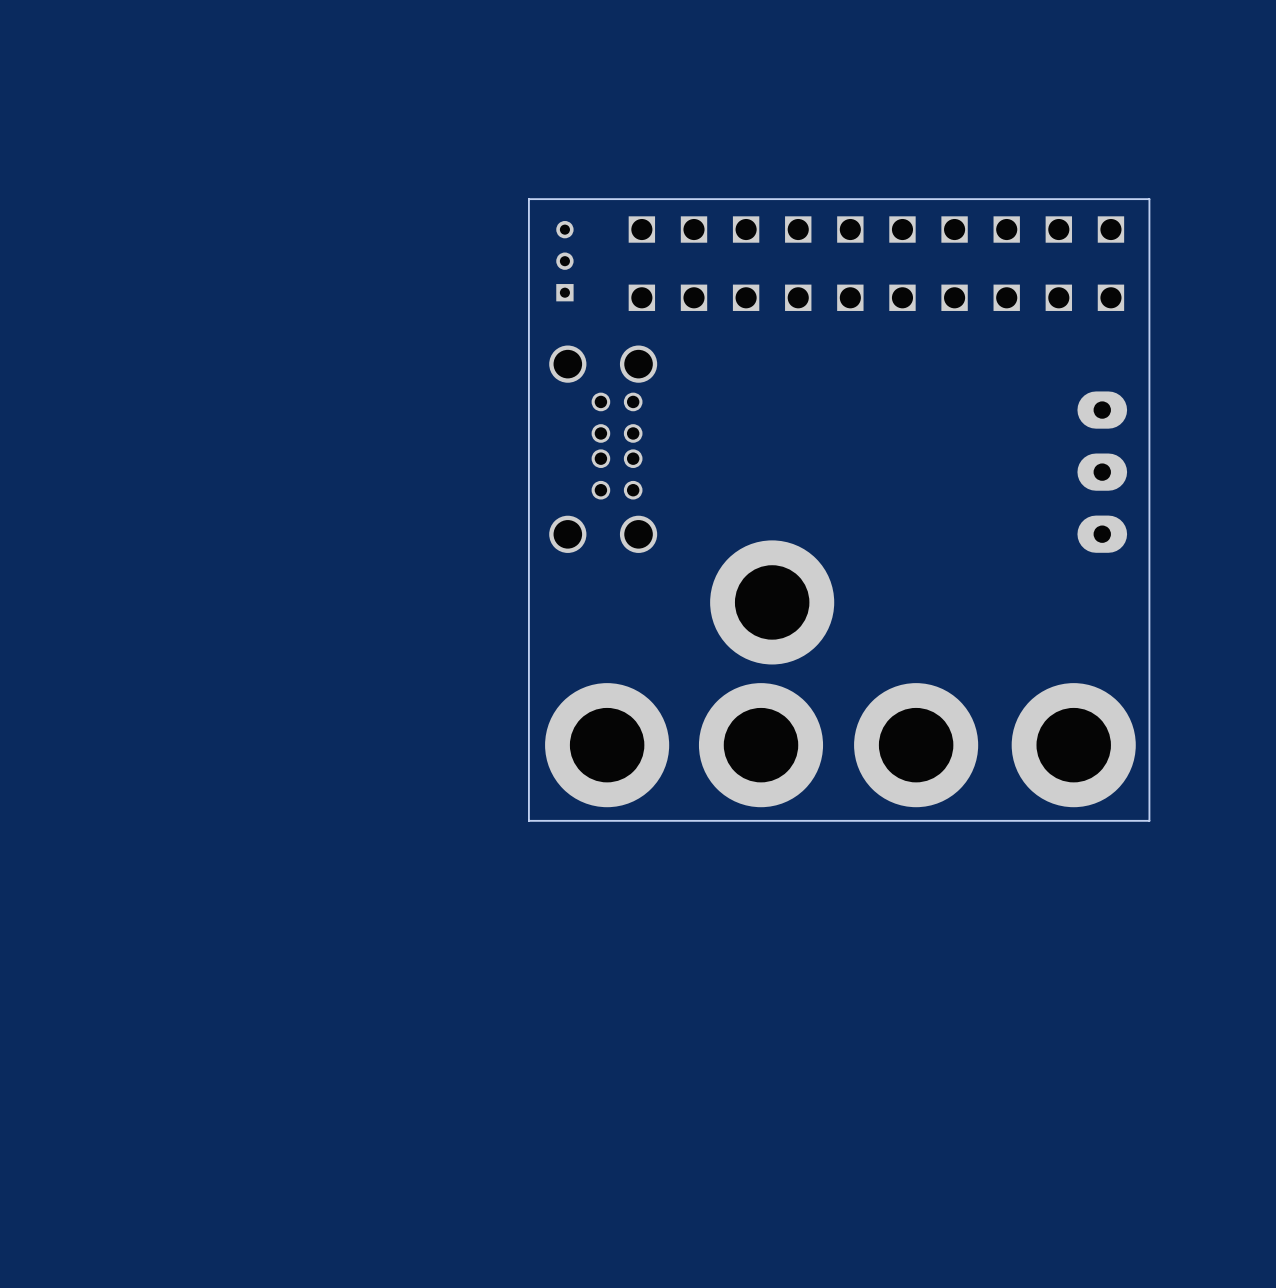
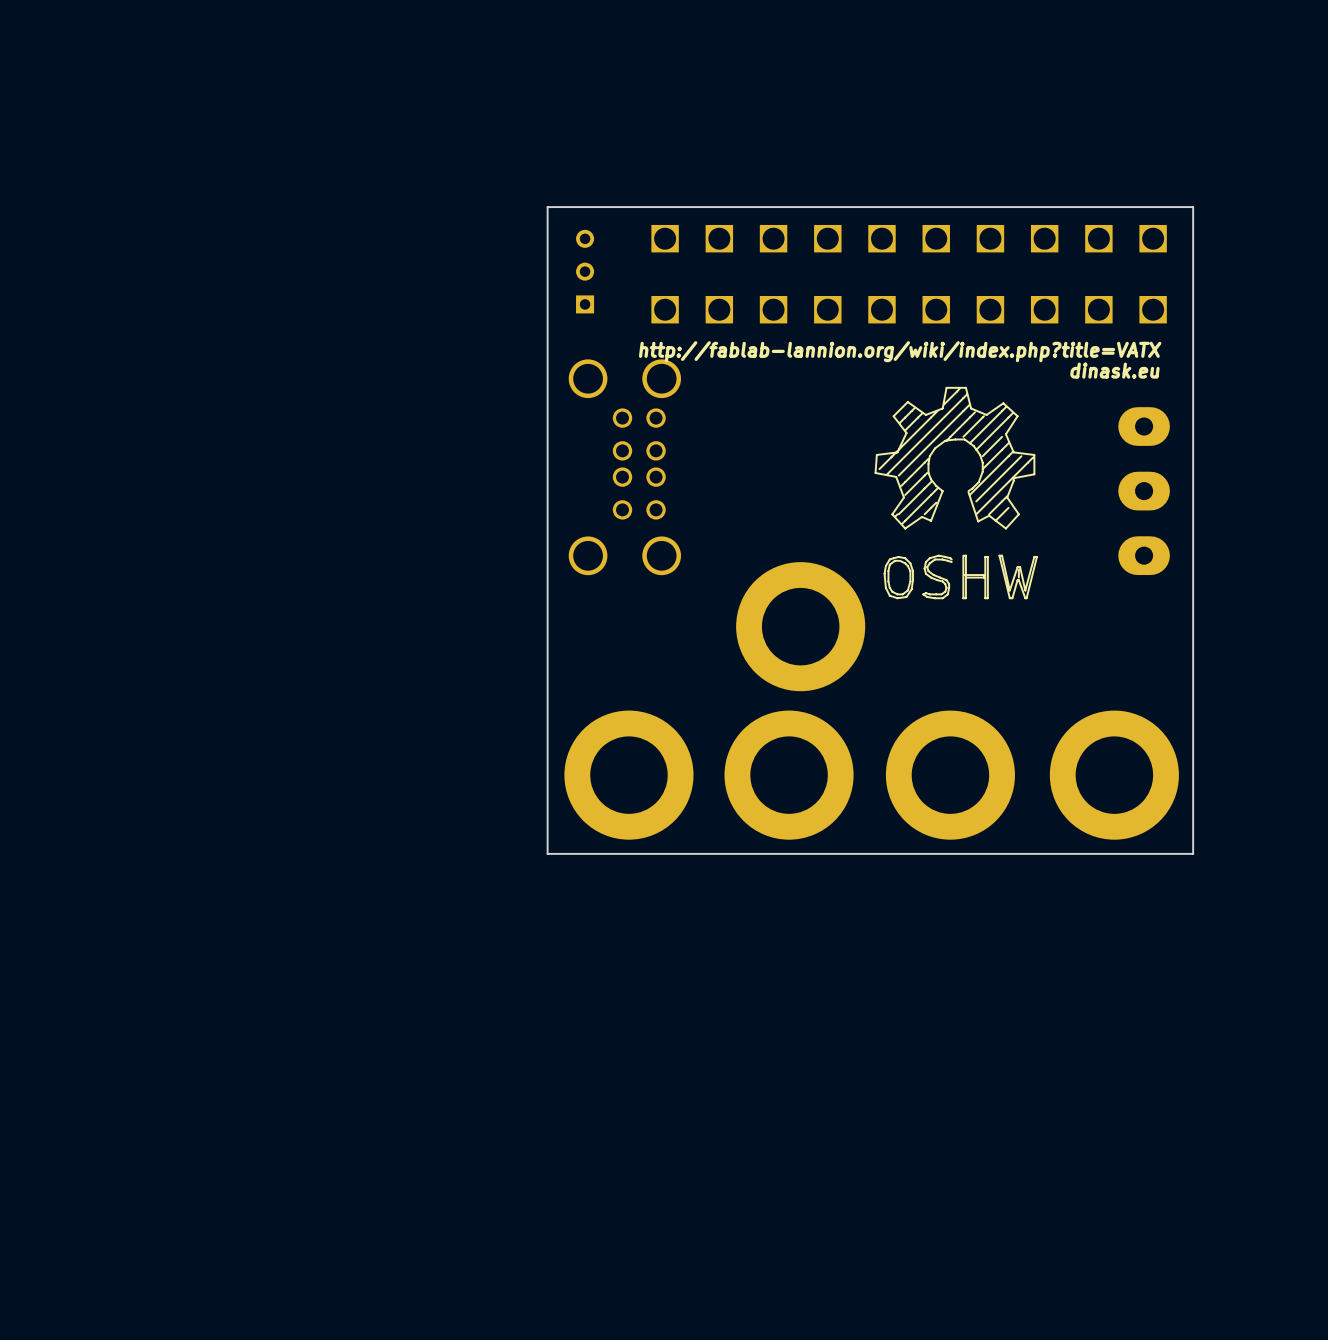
text: none -> http://fablab-lannion.org/wiki/index.php?title=VATX (900, 351)
text: none -> dinask.eu (1114, 370)
drawing: none -> [874, 386, 1038, 600]

